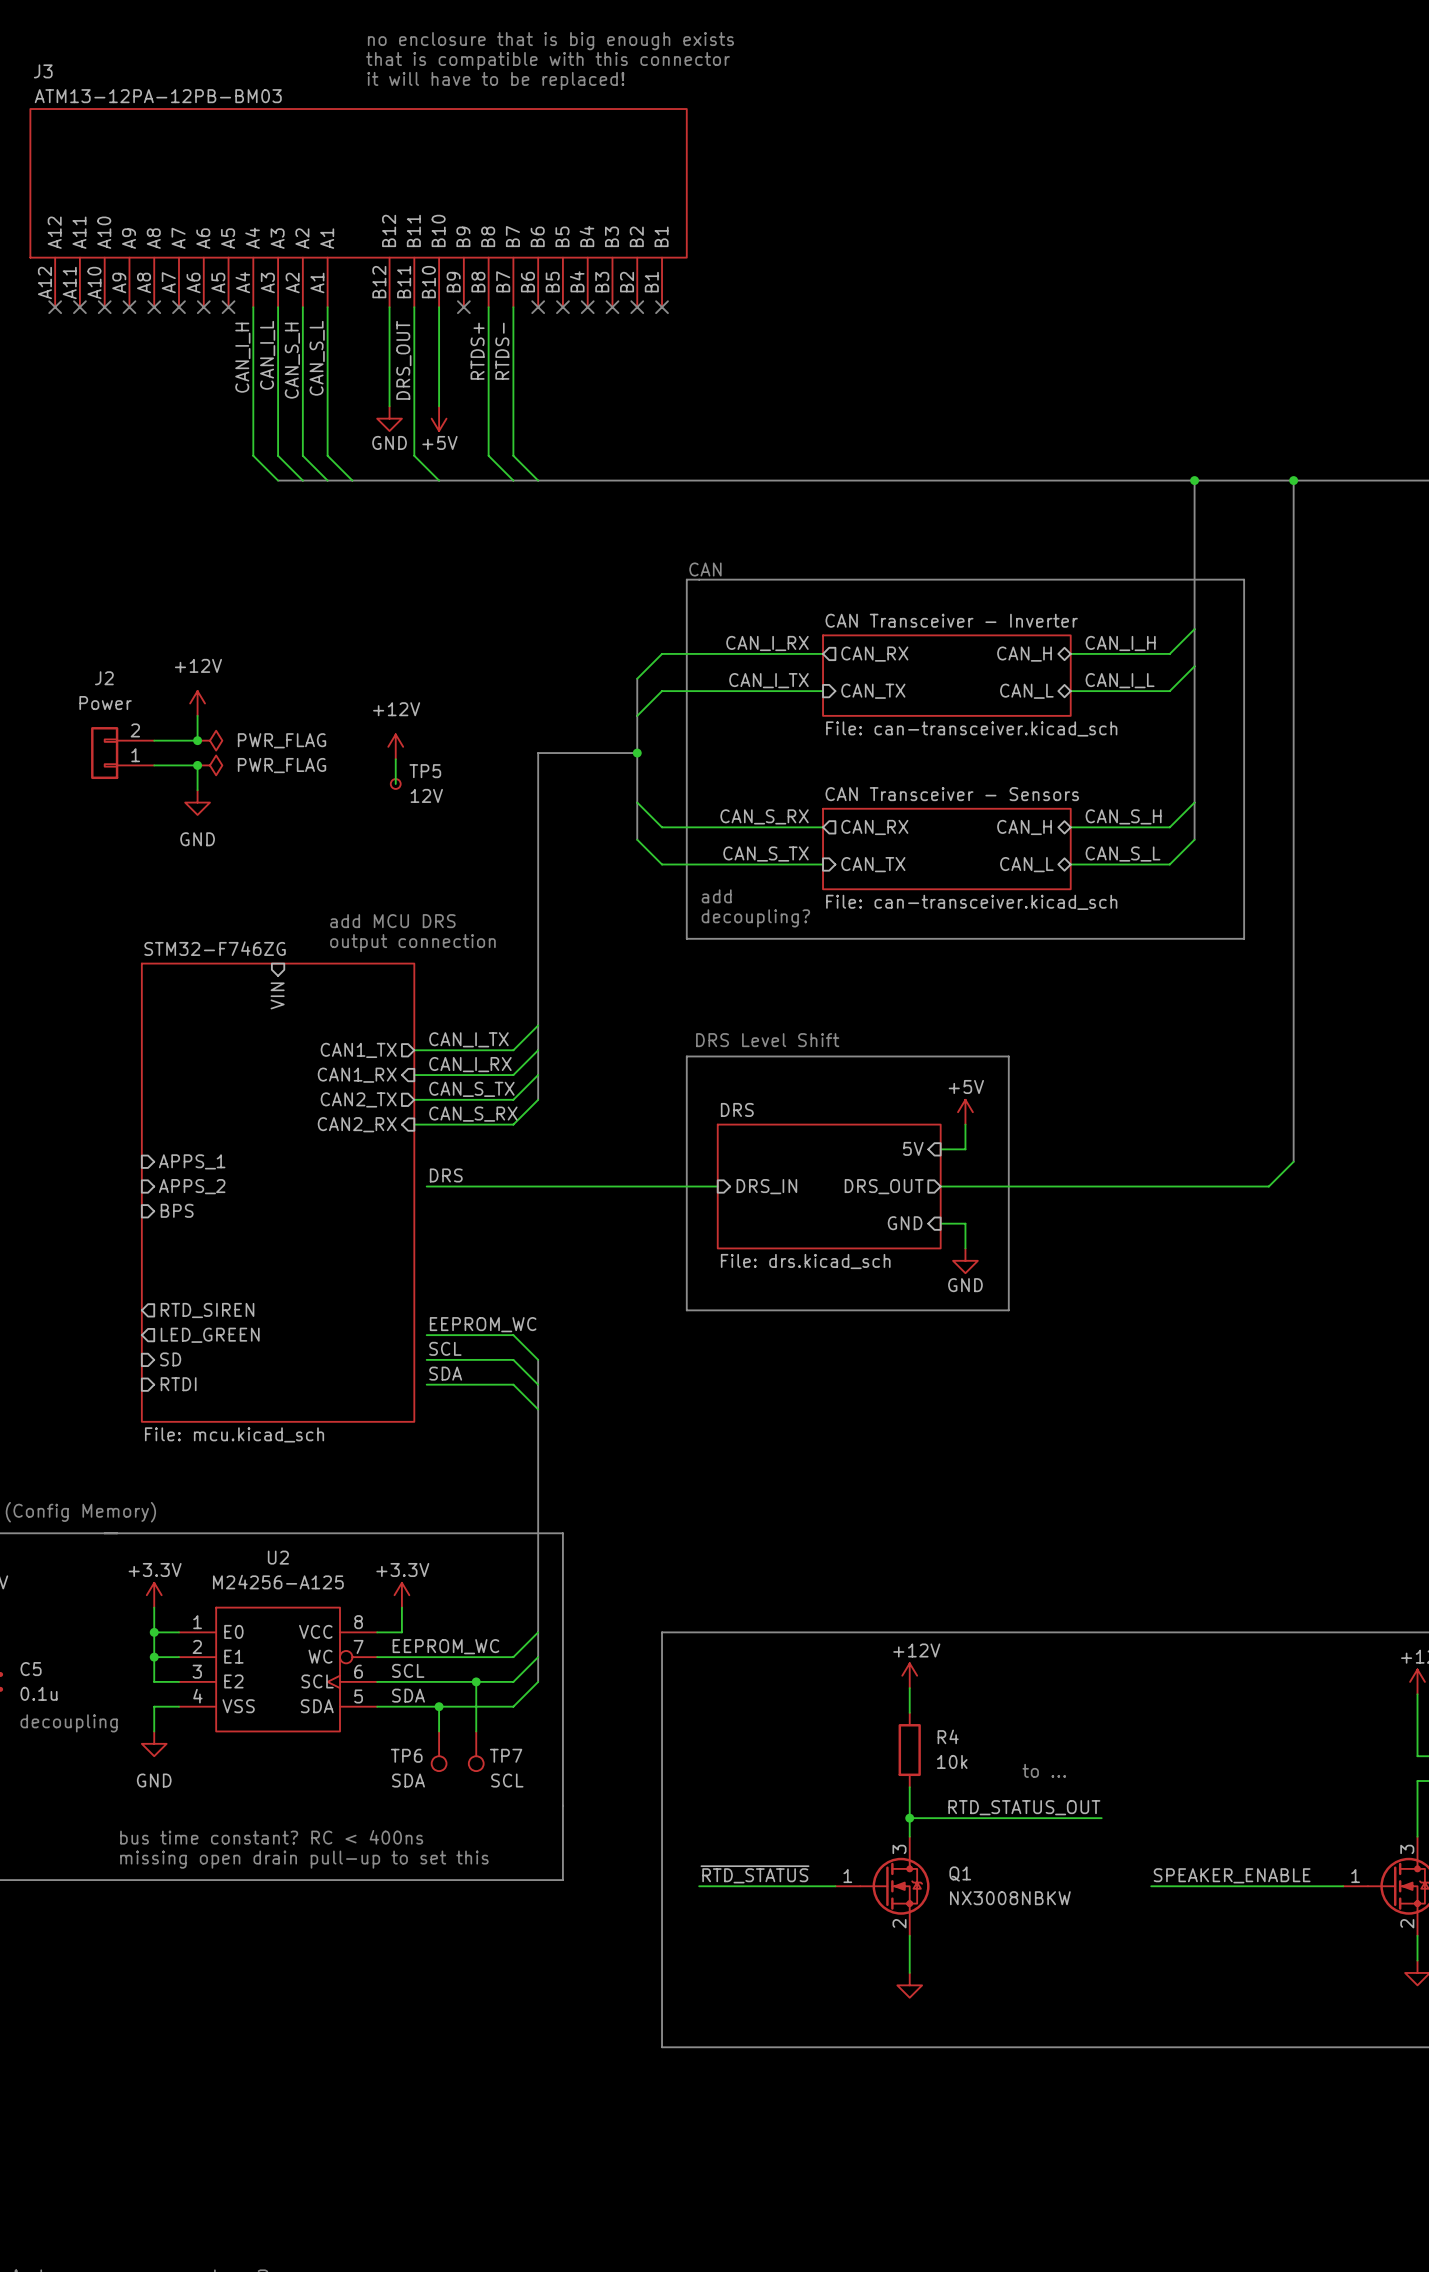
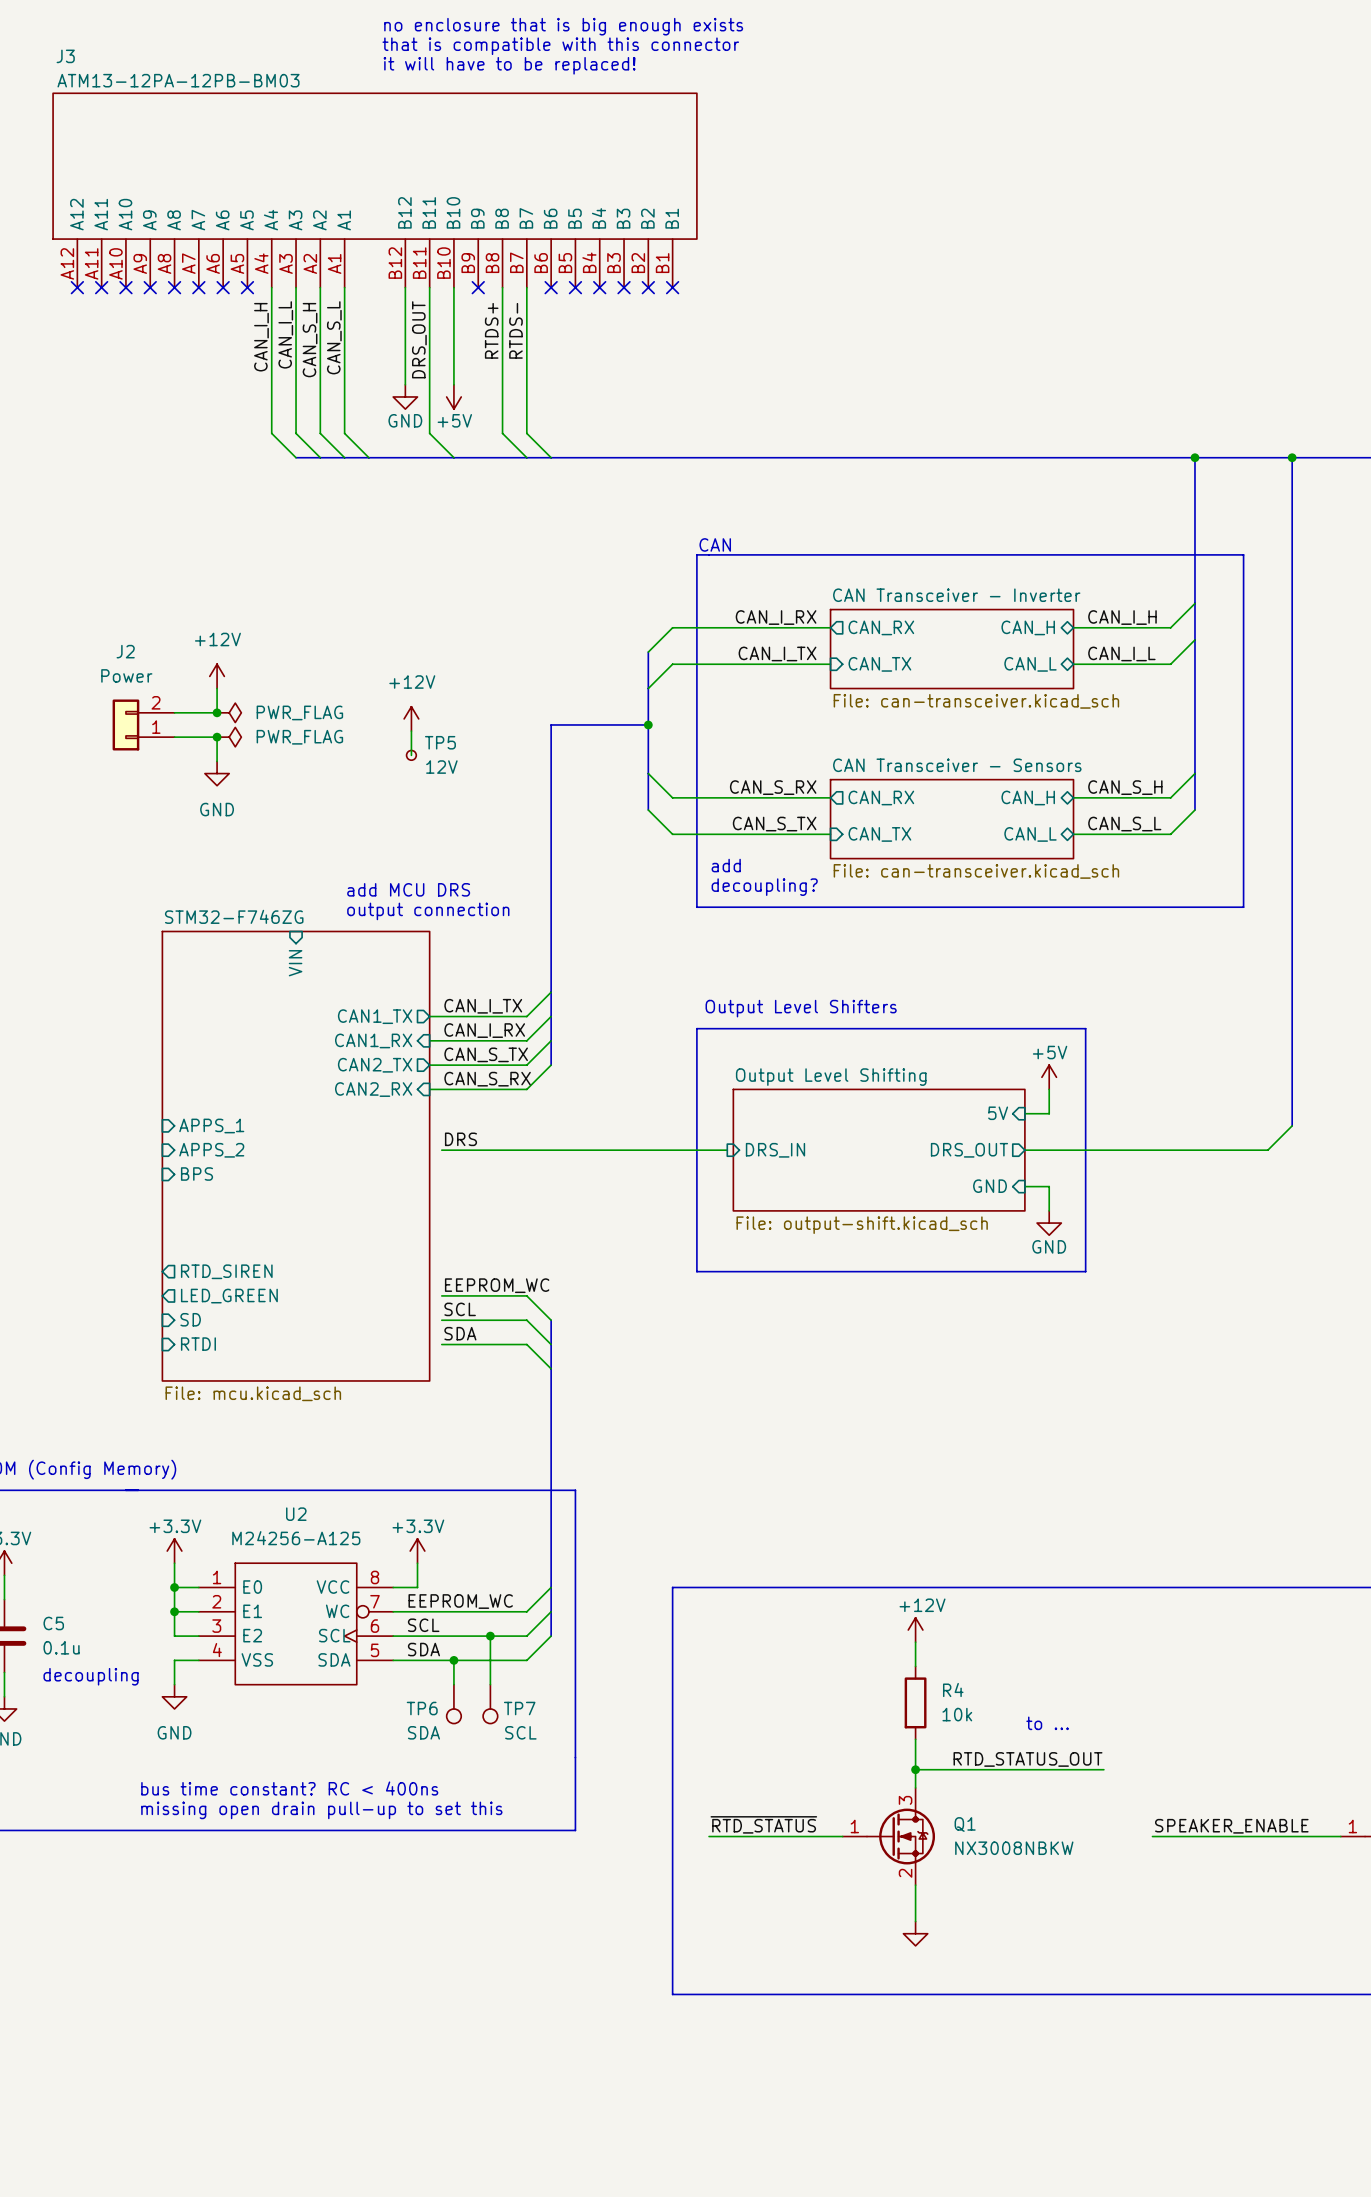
text: DRS Level Shift (767, 1040) -> Output Level Shifters (801, 1008)
line: (686, 1062) (686, 1056) (1008, 1056) (1008, 1310) -> (696, 1028) (1085, 1028) (1085, 1271) (1012, 1271)
power symbol position: +5V (965, 1112) -> +5V (1049, 1077)
wire: (965, 1124) (965, 1149) (940, 1149) -> (1049, 1089) (1049, 1113) (1024, 1113)
sheet pin position: 5V (913, 1148) -> 5V (998, 1113)
sheet DRS: File: drs.kicad_sch (829, 1186) -> none
sheet Output Level Shifting: none -> File: output-shift.kicad_sch (879, 1150)
sheet pin position: DRS_OUT (884, 1186) -> DRS_OUT (969, 1150)
wire: (940, 1186) (1021, 1186) -> none
sheet pin position: GND (905, 1223) -> GND (990, 1186)
wire: (940, 1223) (965, 1223) (965, 1248) -> (1024, 1186) (1049, 1186) (1049, 1210)
power symbol position: GND (965, 1260) -> GND (1049, 1223)

